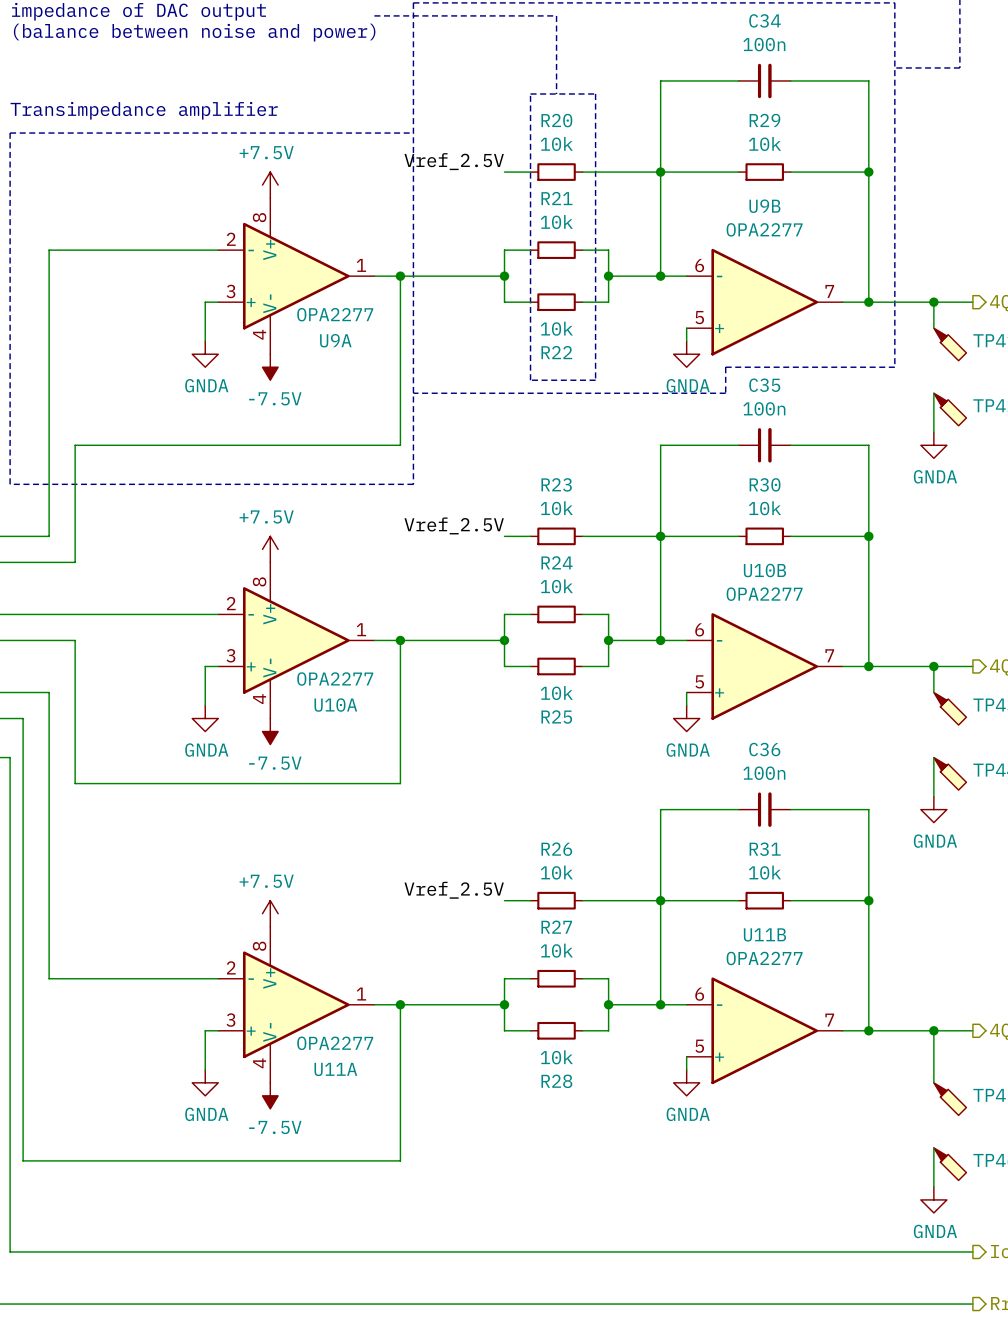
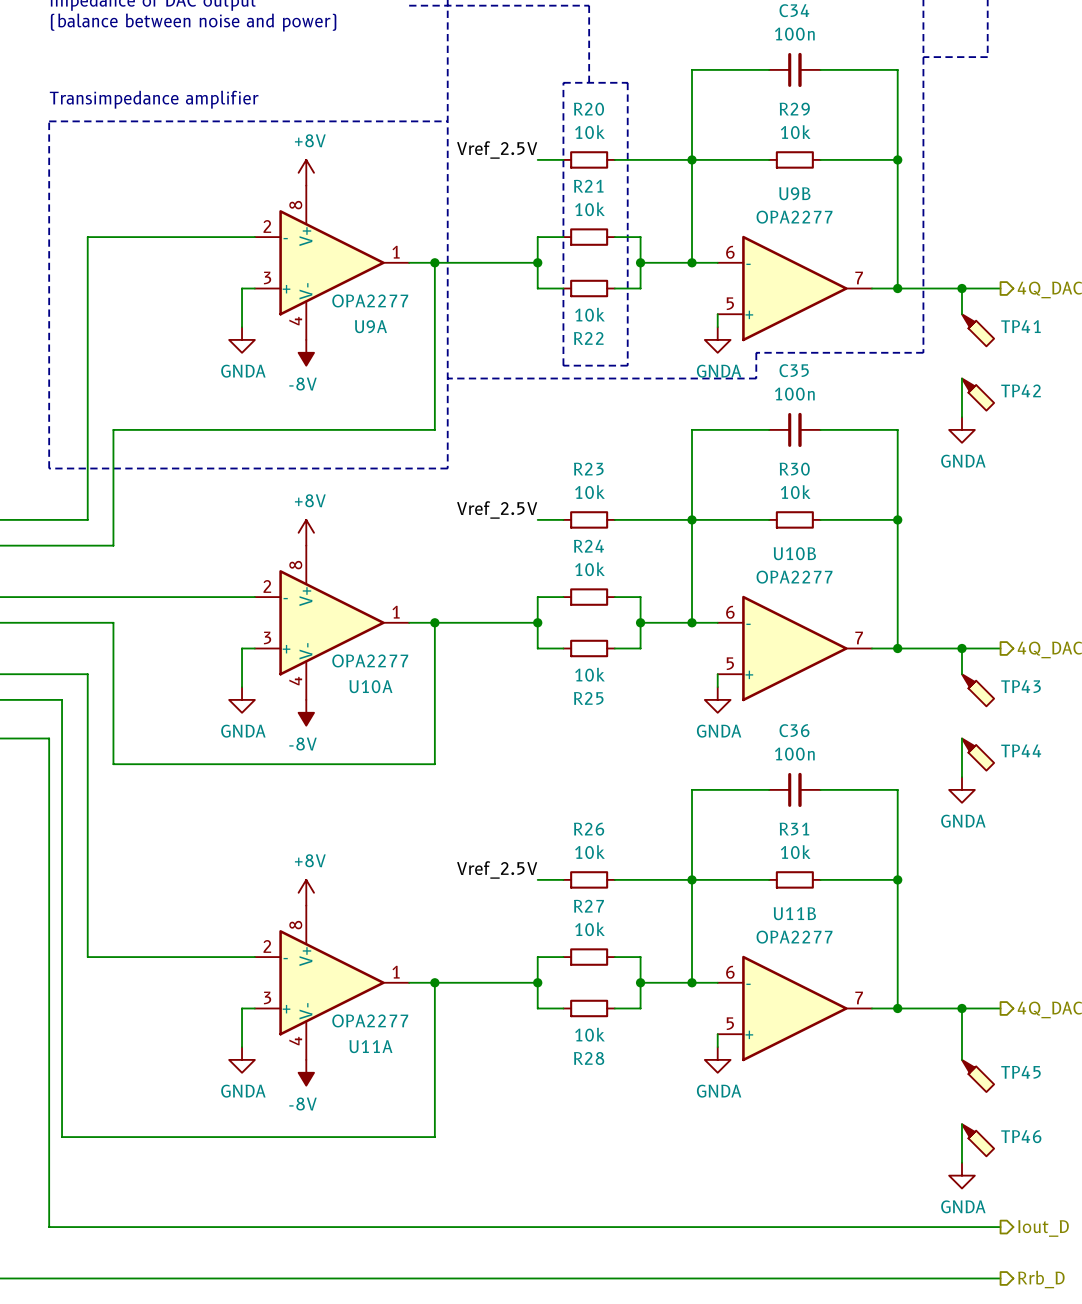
power symbol: +7.5V (270, 185) -> +8V (306, 172)
power symbol: -7.5V (270, 367) -> -8V (306, 352)
power symbol: +7.5V (270, 549) -> +8V (306, 532)
power symbol: -7.5V (270, 731) -> -8V (306, 712)
power symbol: +7.5V (270, 913) -> +8V (306, 892)
power symbol: -7.5V (270, 1095) -> -8V (306, 1072)

